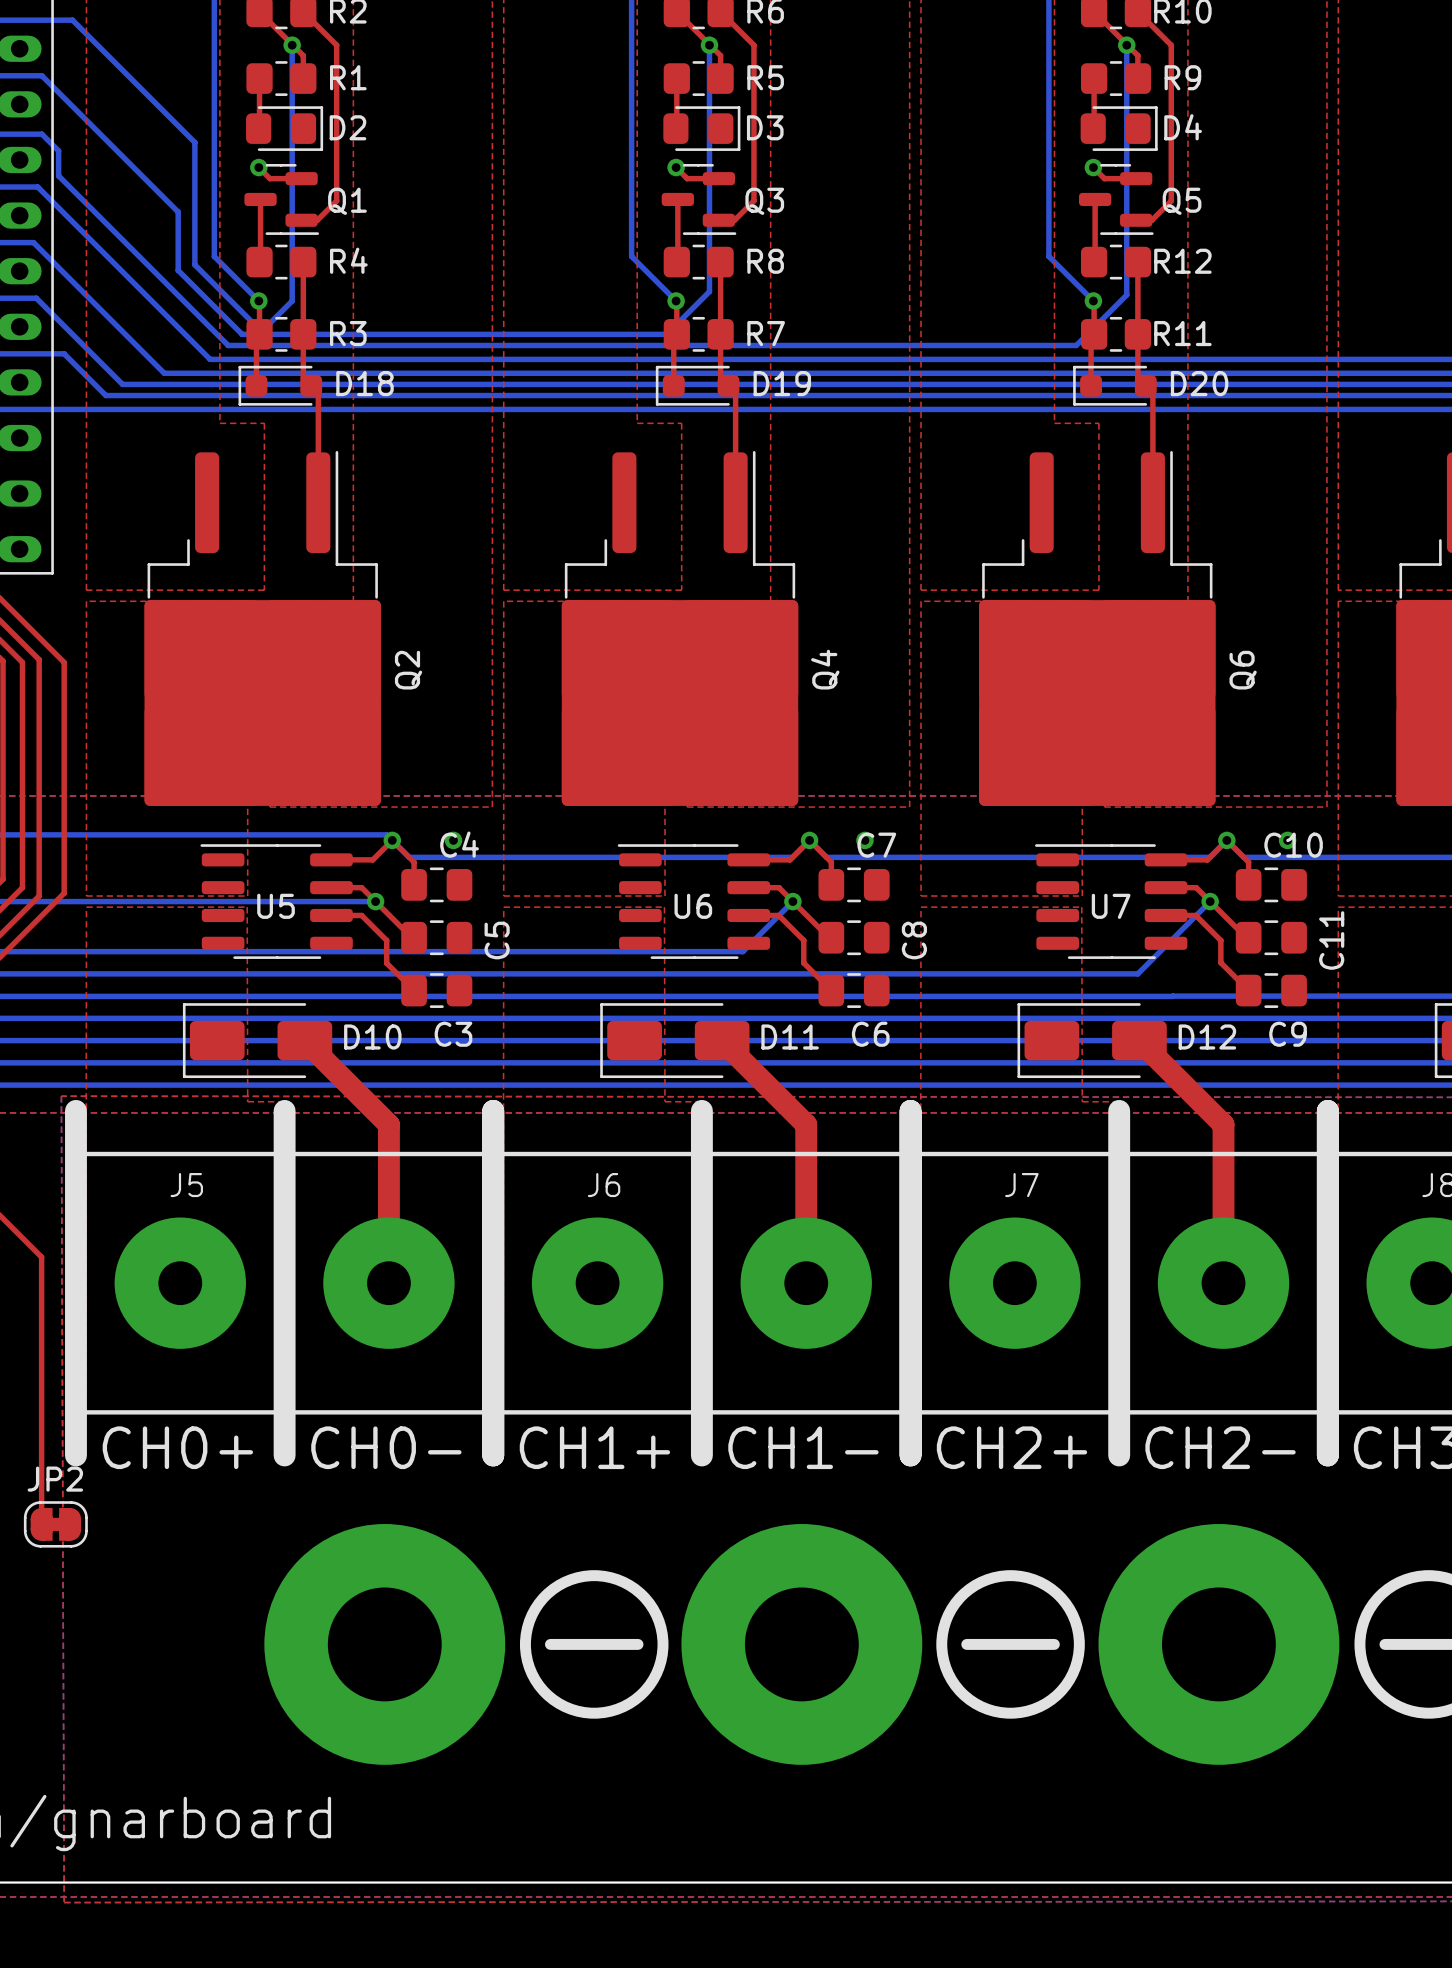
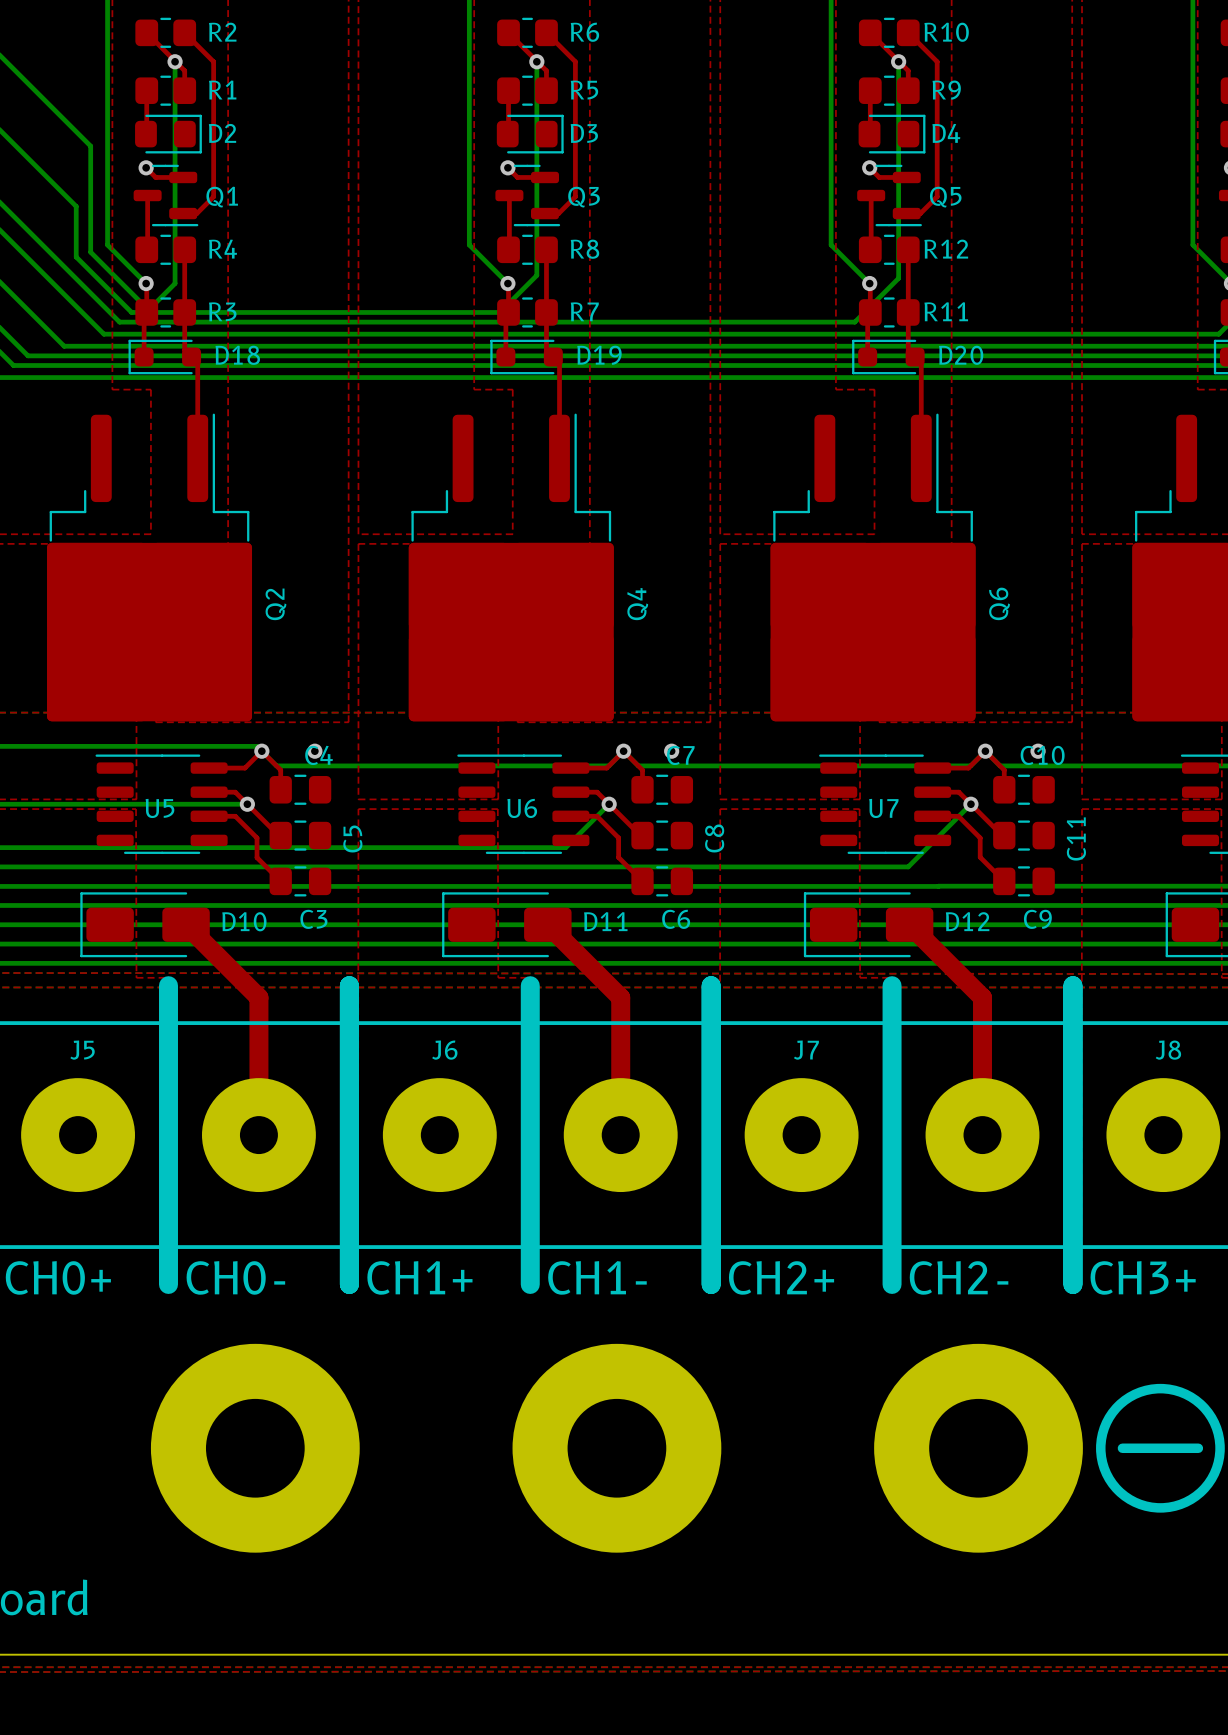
drawing: [519, 1570, 669, 1719] -> none
drawing: [936, 1570, 1085, 1719] -> none
line: (550, 1644) (638, 1644) -> none
line: (966, 1644) (1054, 1644) -> none

